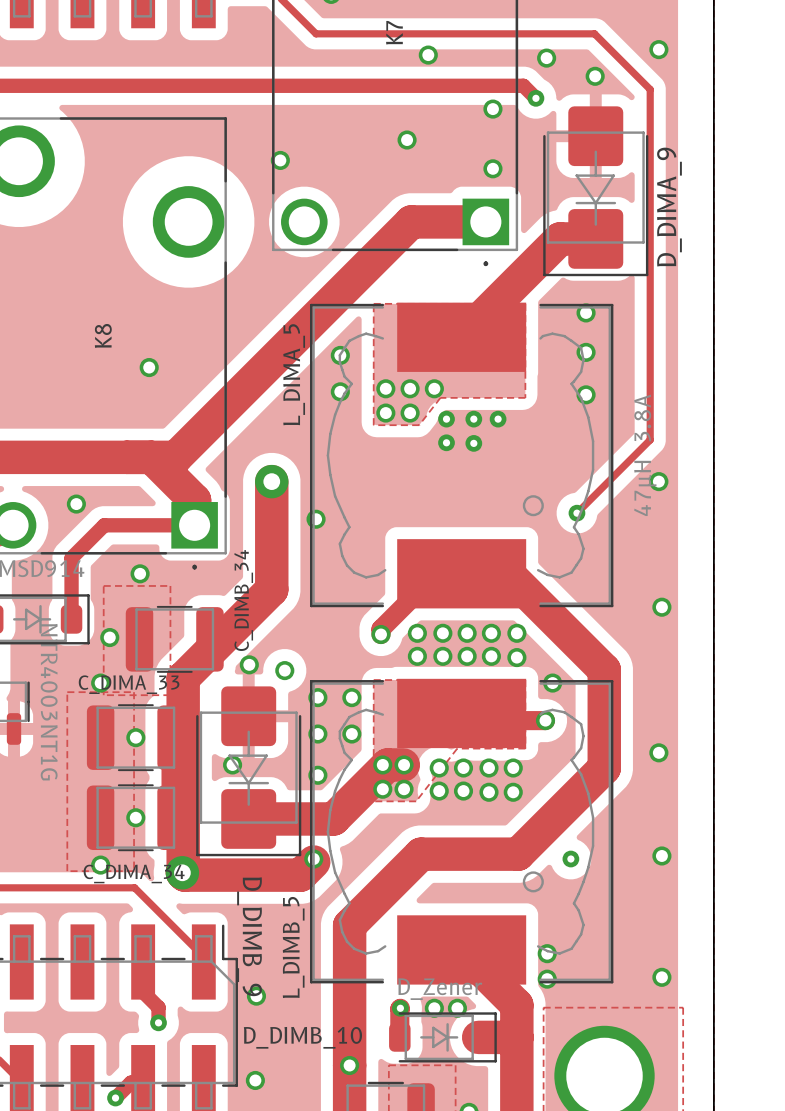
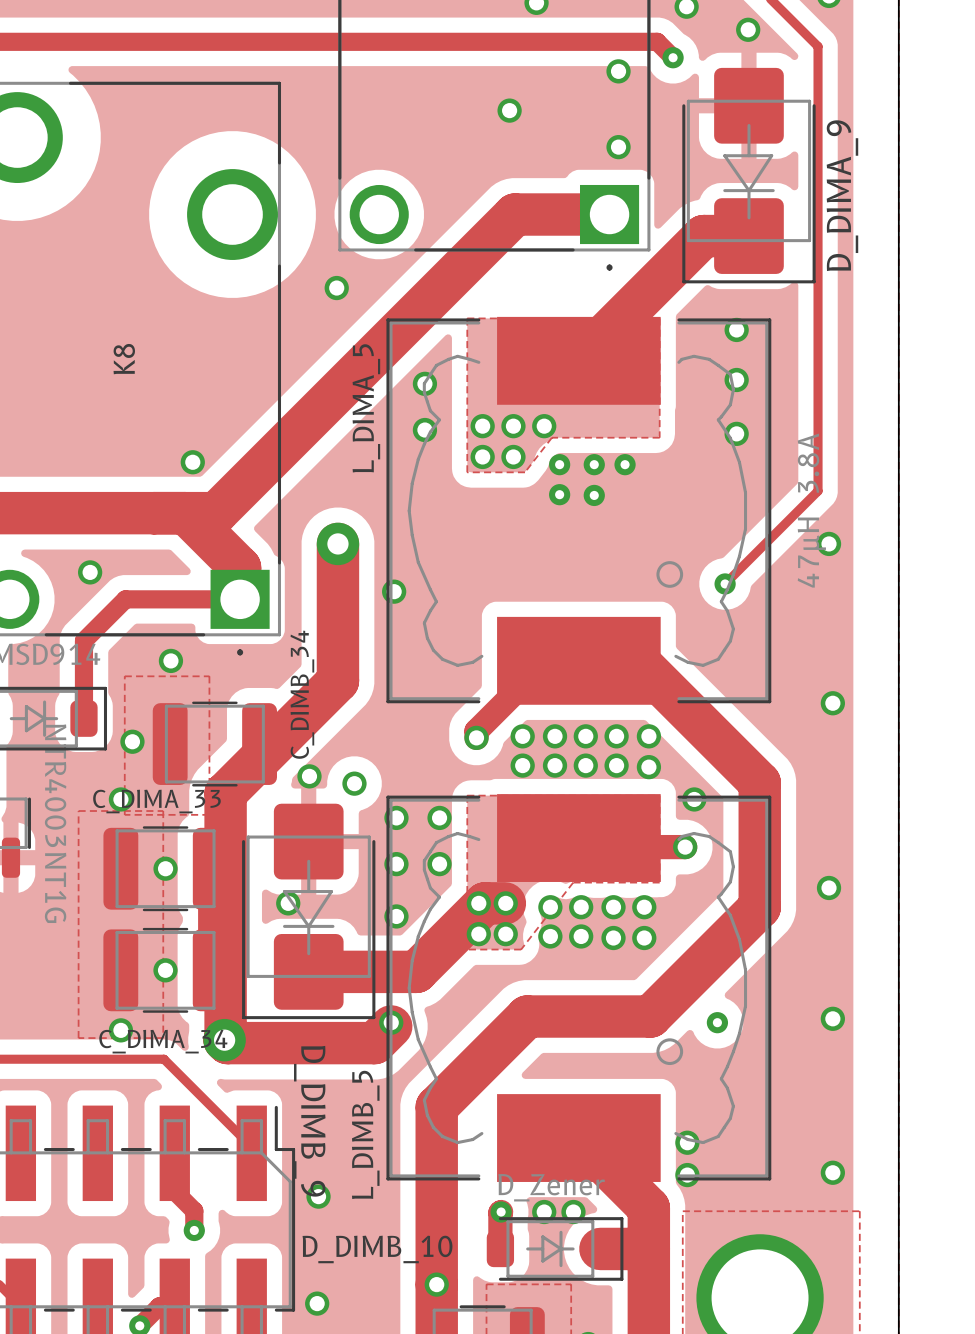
via: (280, 160) -> none
via: none -> (336, 288)
via position: (149, 367) -> (192, 462)

